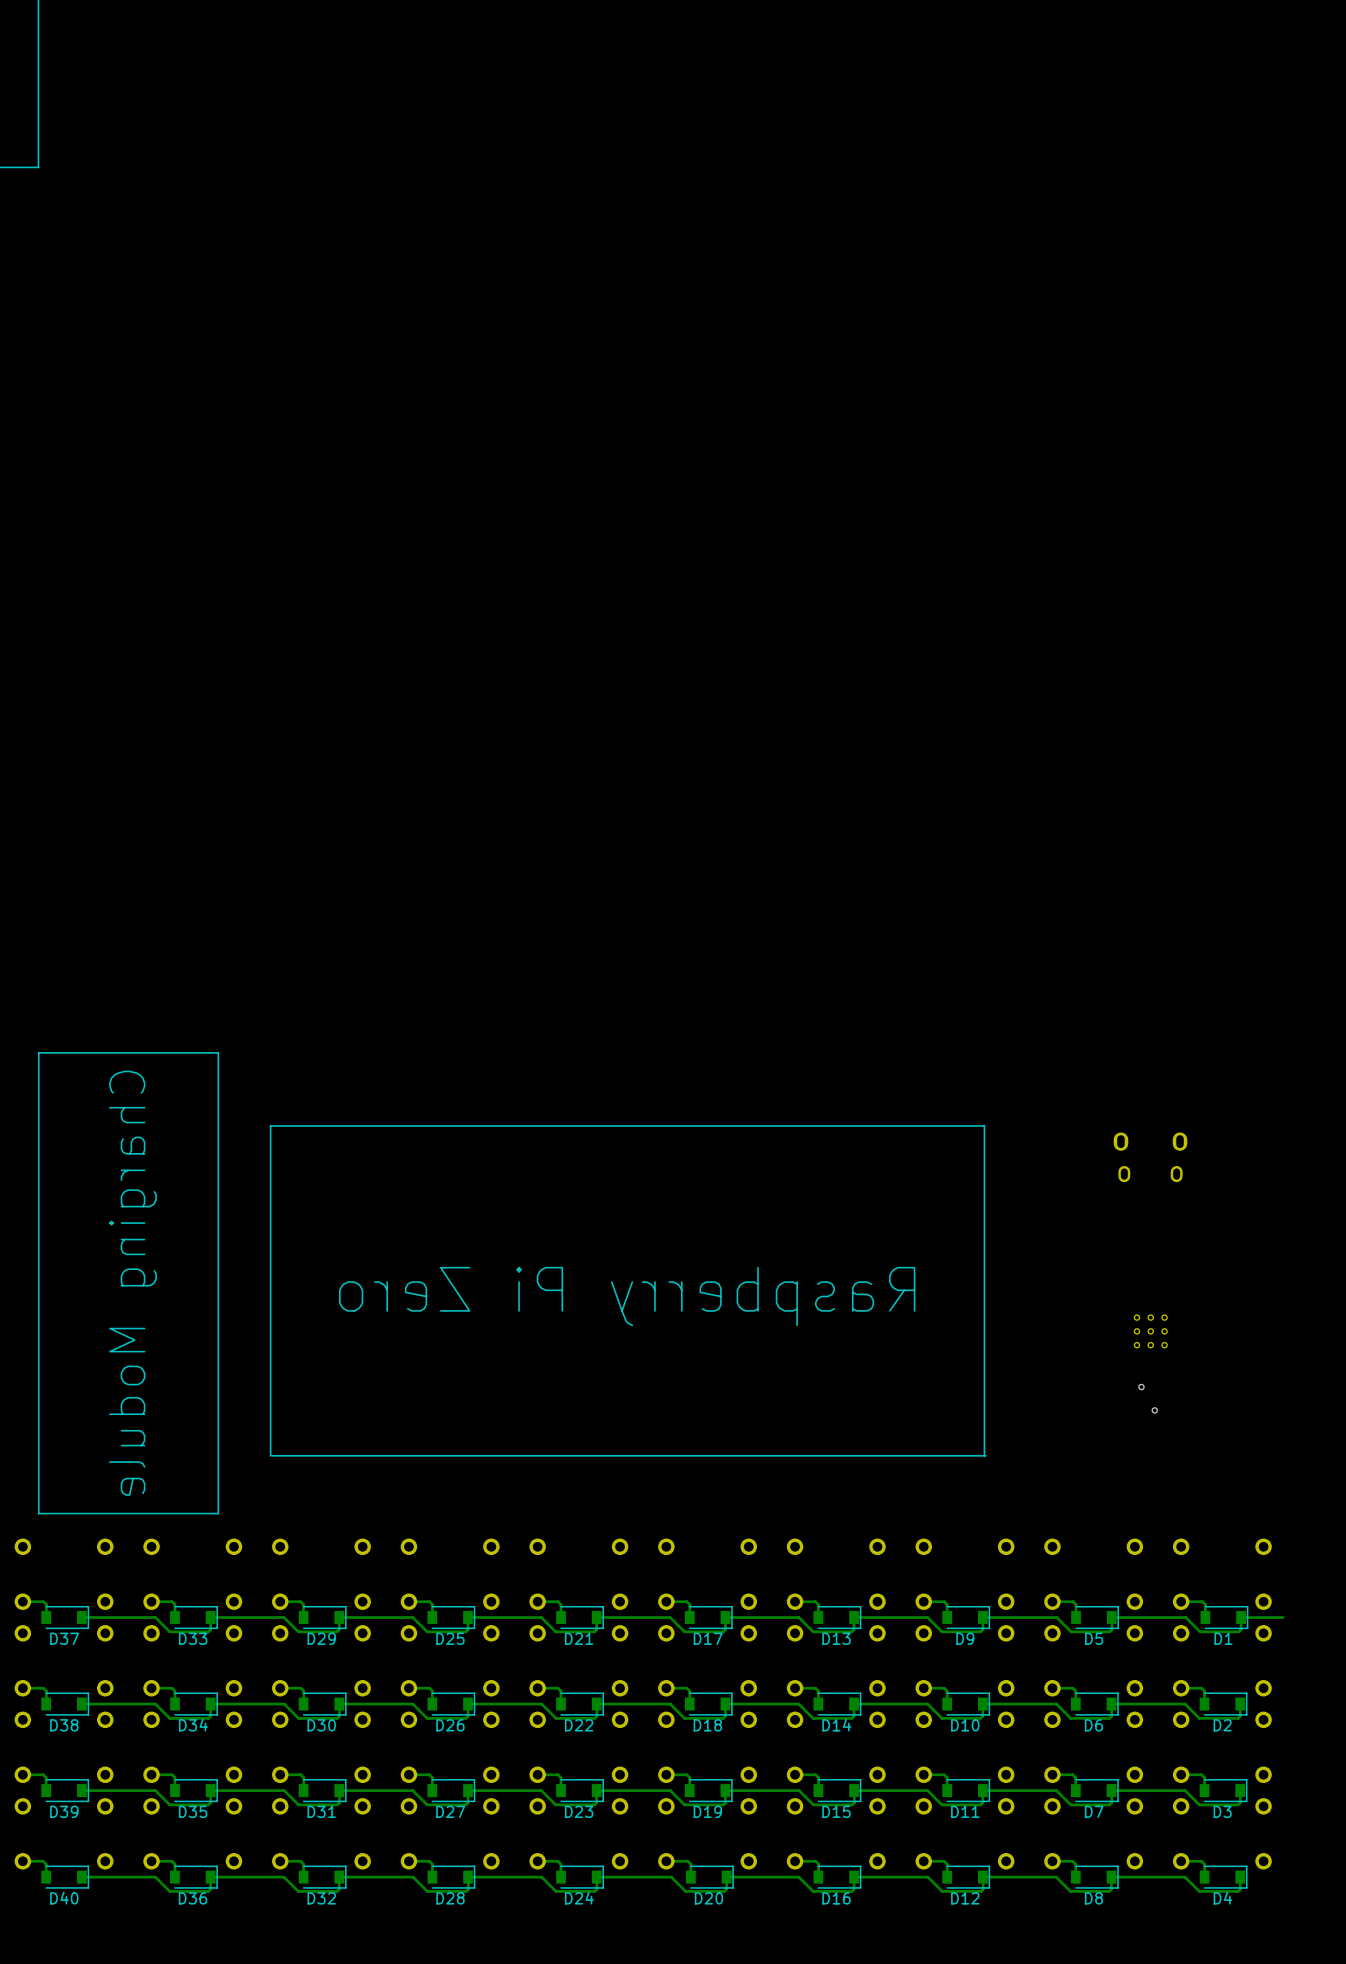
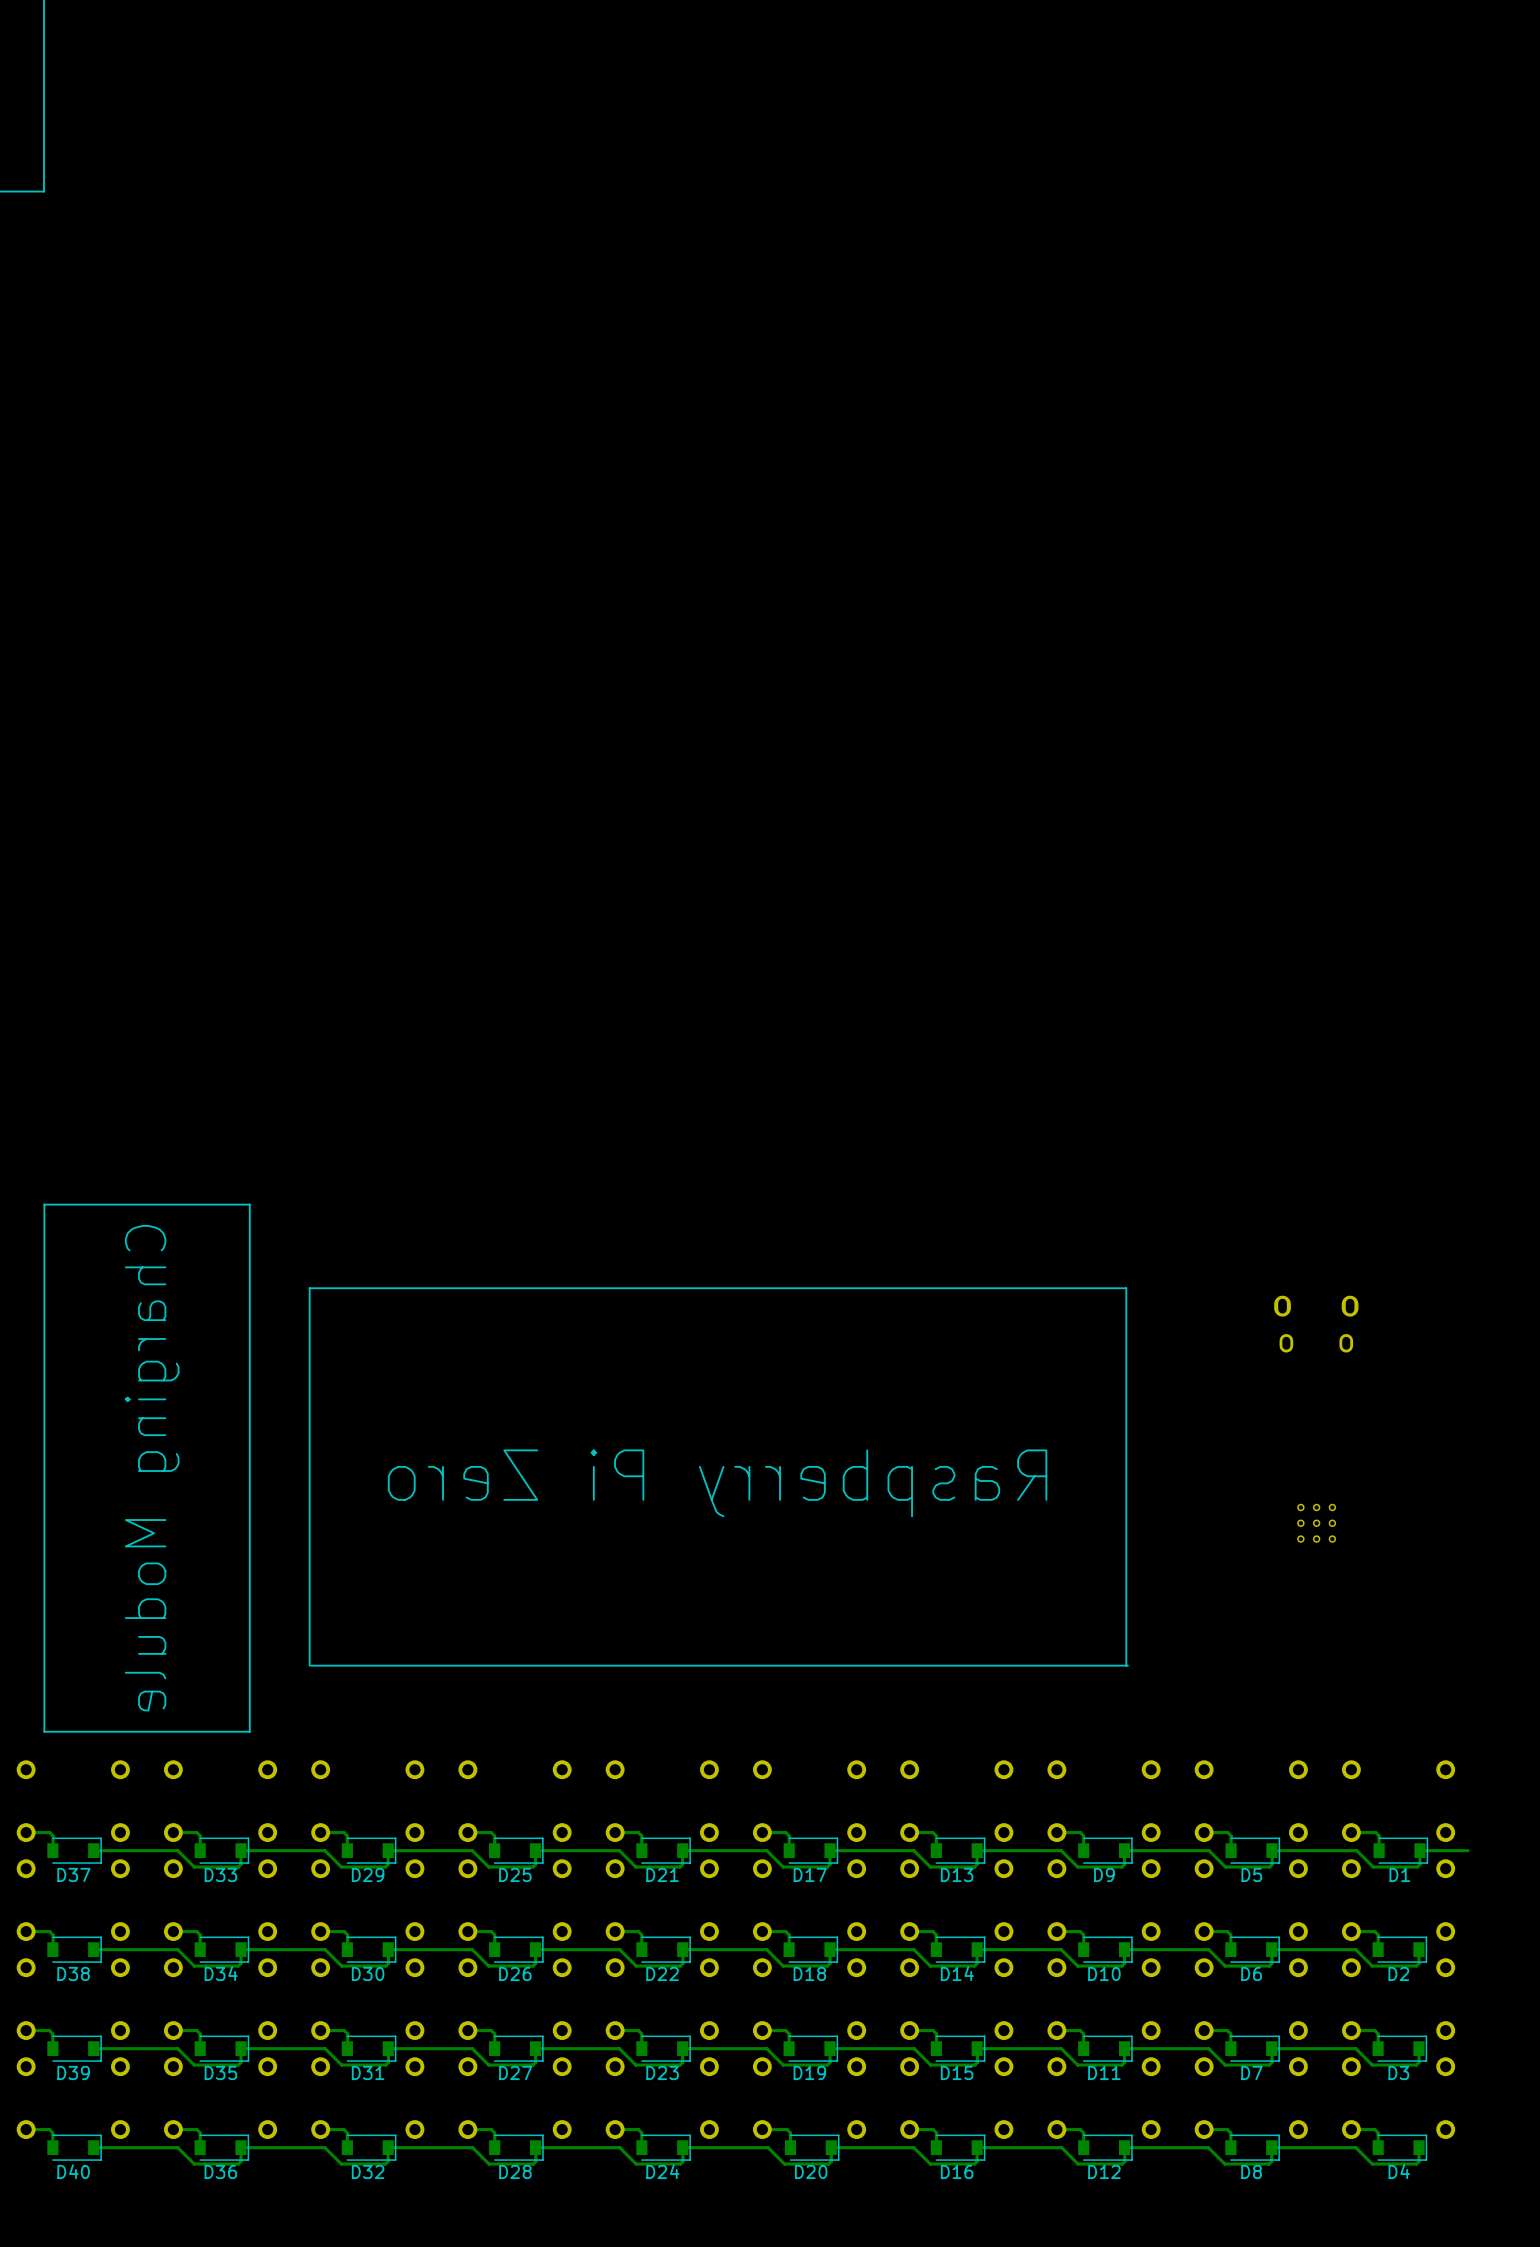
via: (1141, 1387) -> none
via: (1154, 1410) -> none

